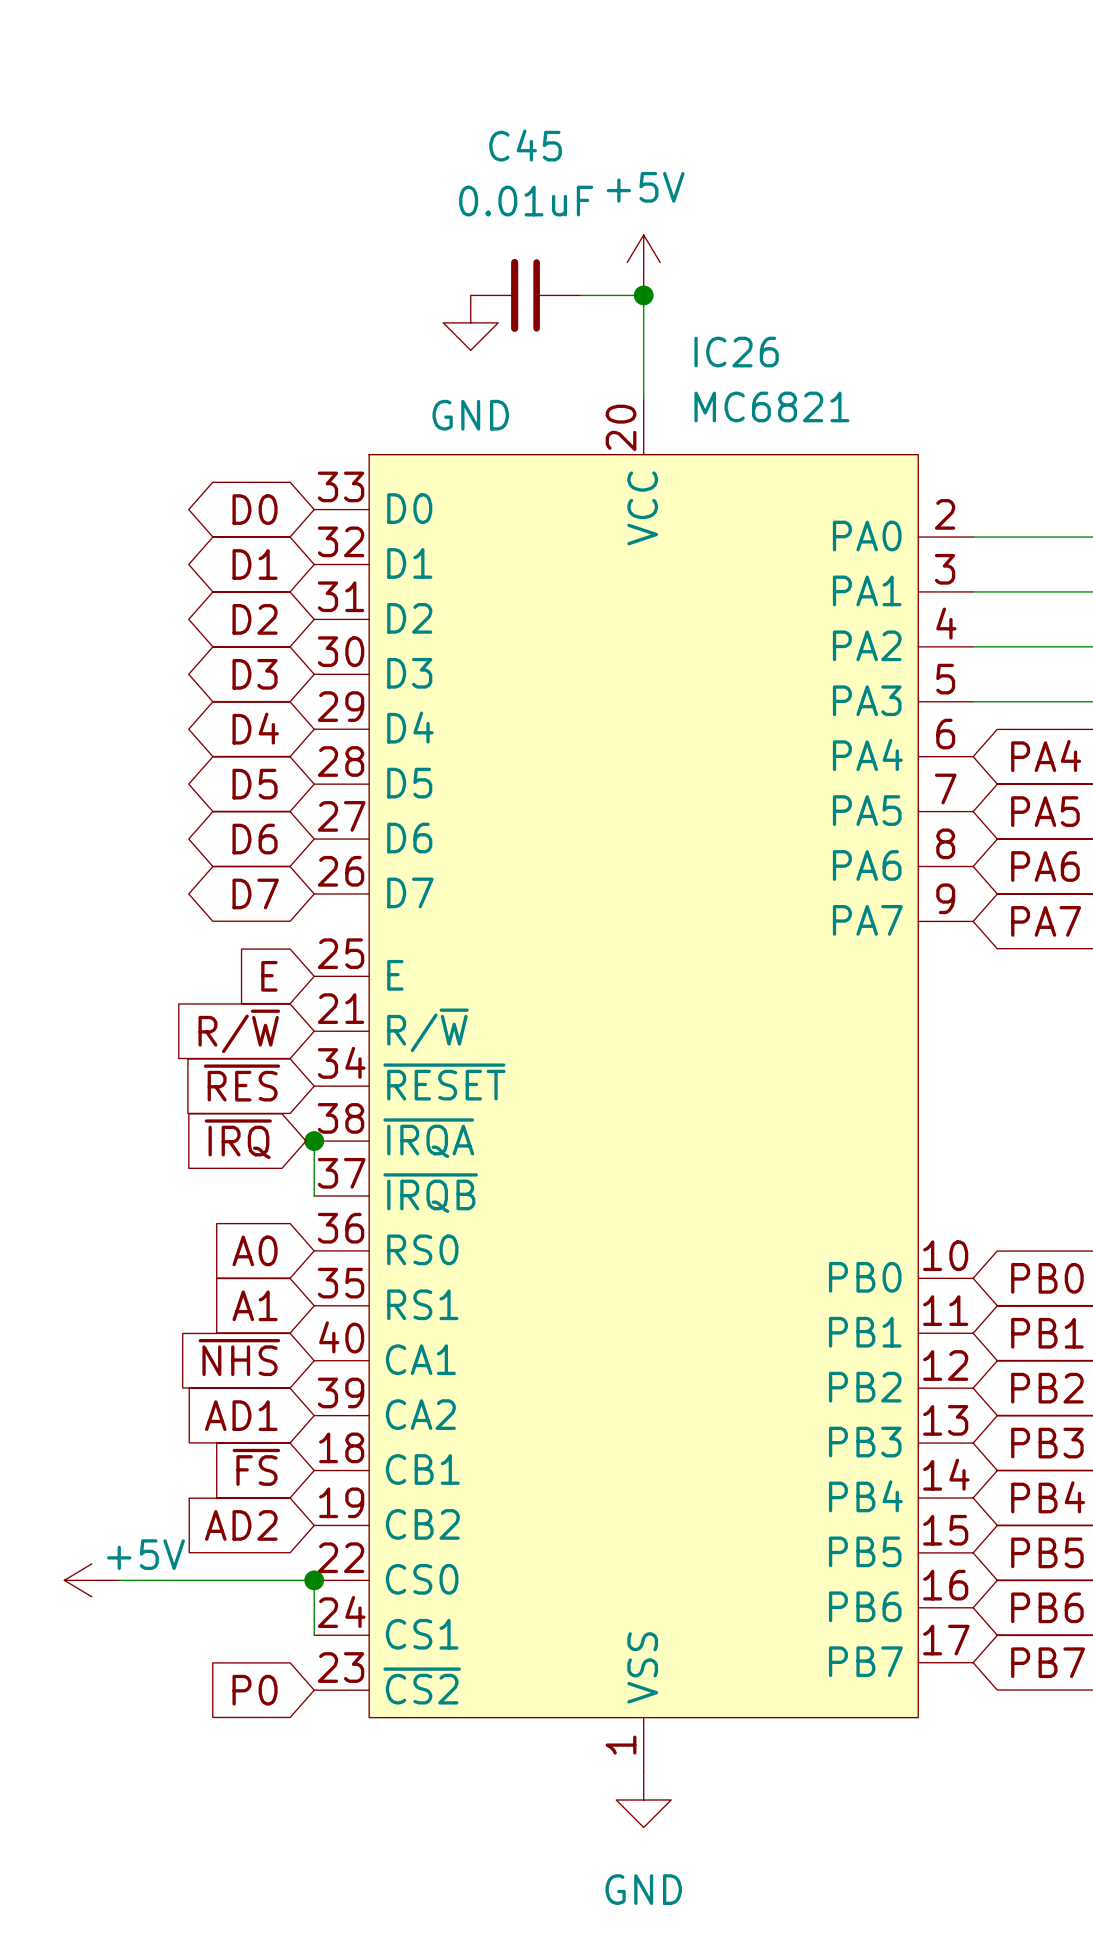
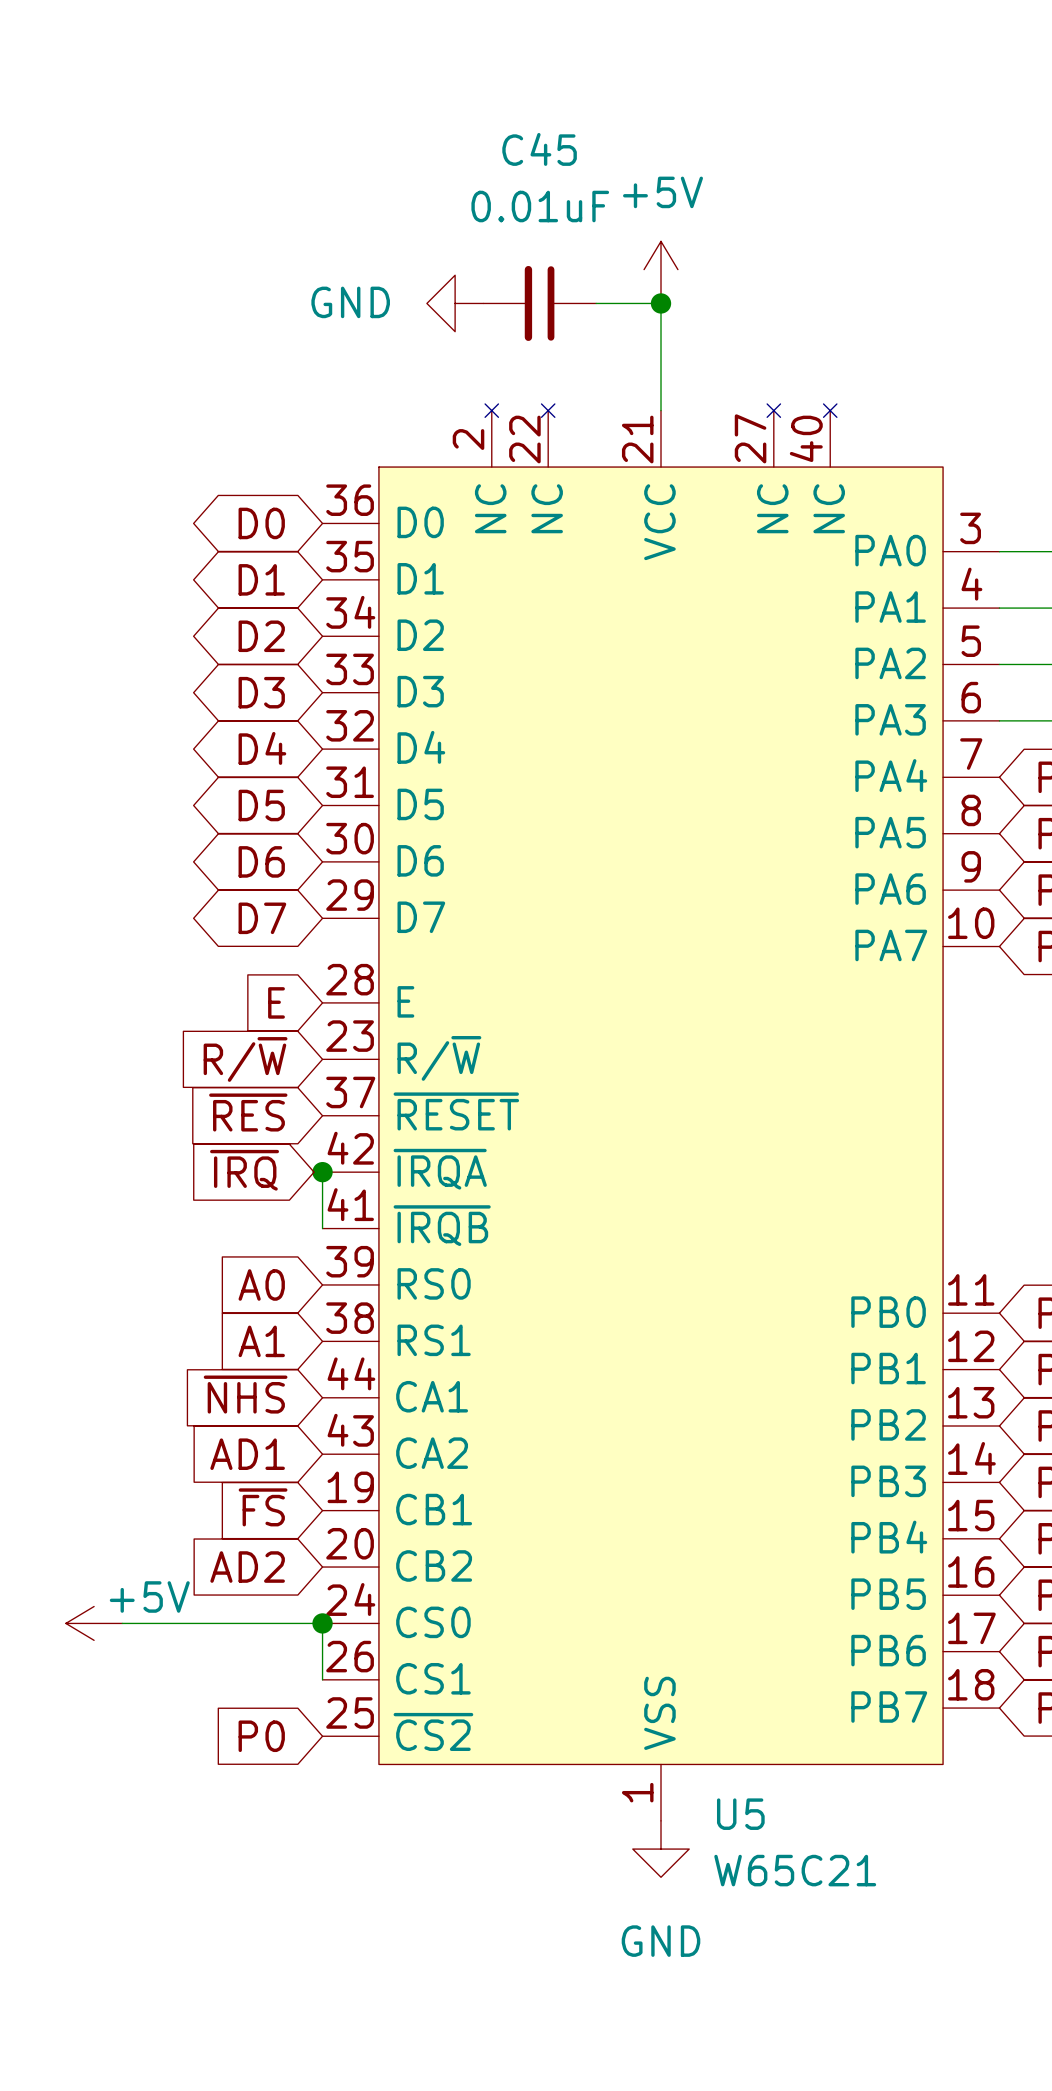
power symbol rotation: 0° (470, 322) -> 90° clockwise (455, 303)
power symbol position: GND (470, 322) -> GND (455, 303)
U5: none -> W65C21 (661, 1112)
IC26: MC6821 (643, 1086) -> none

